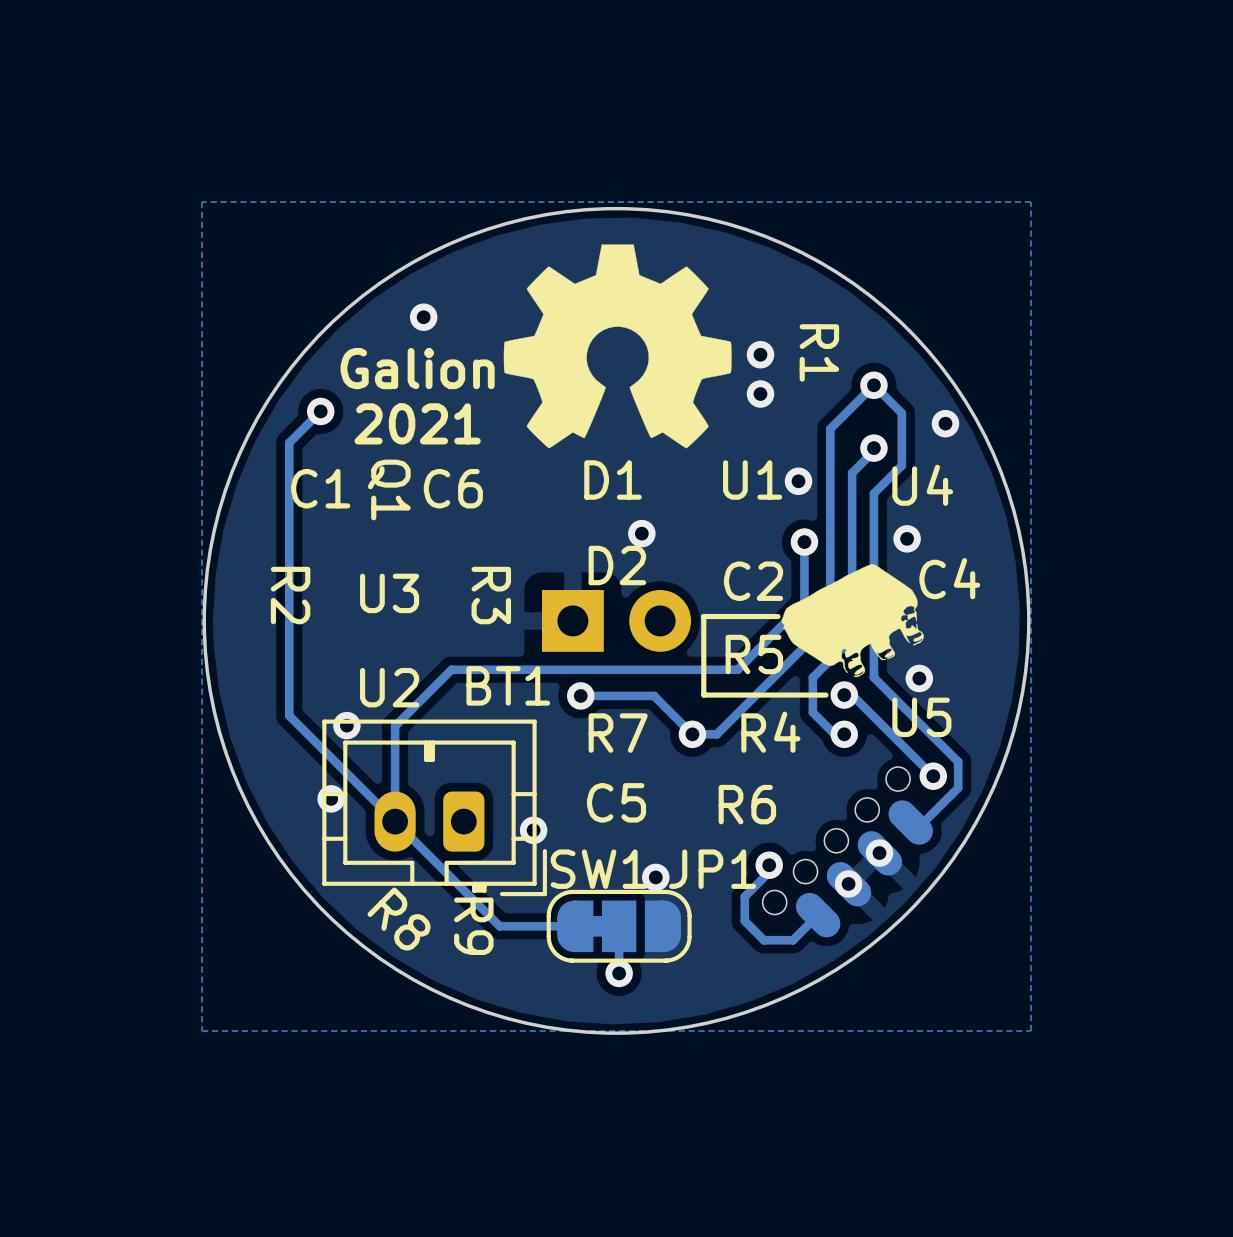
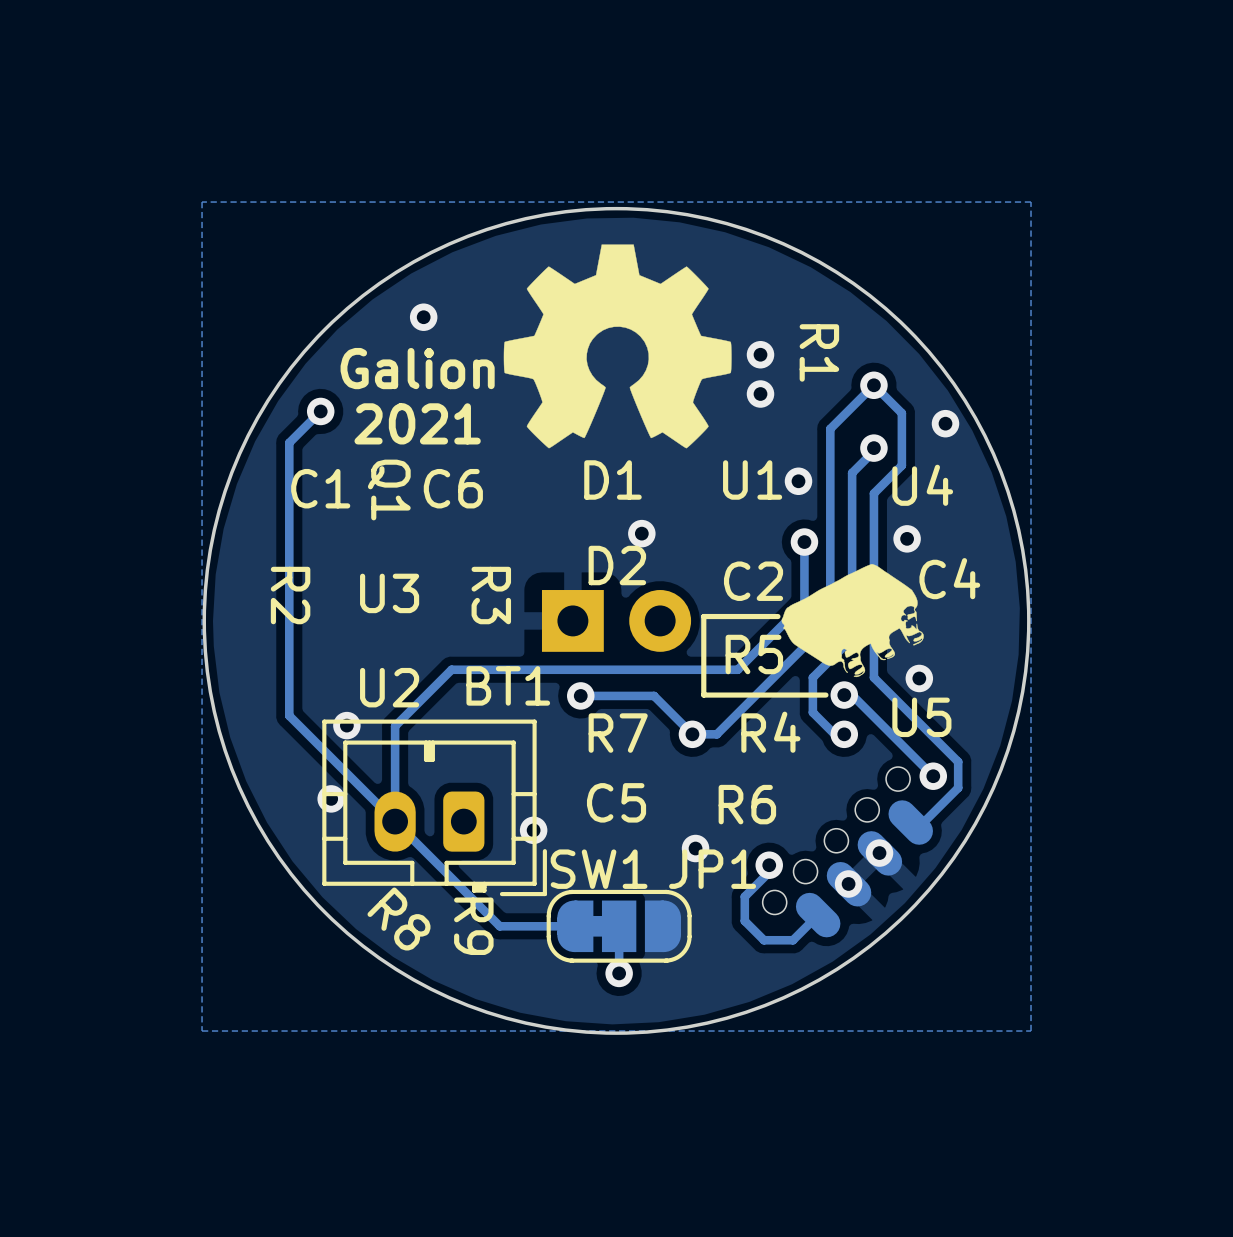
via position: (655, 877) -> (695, 848)

